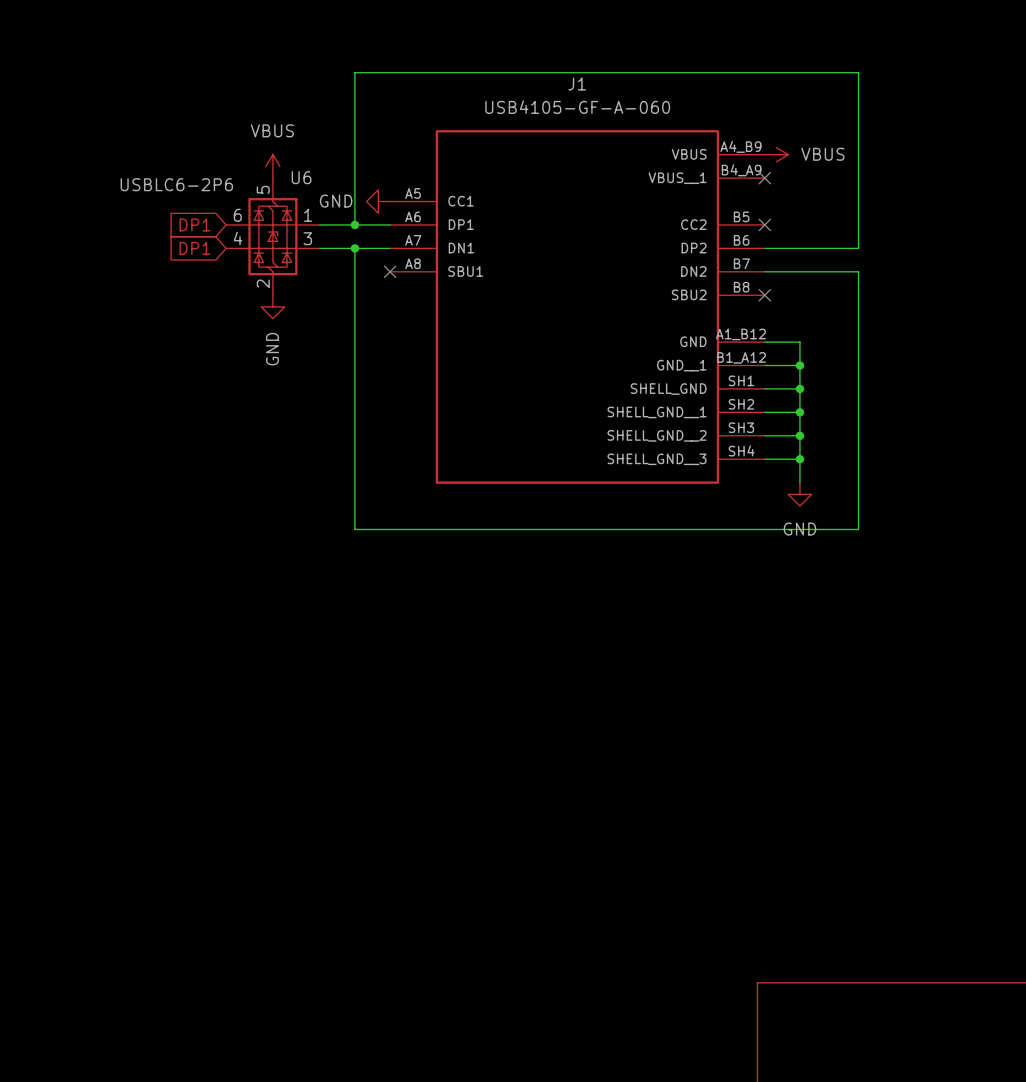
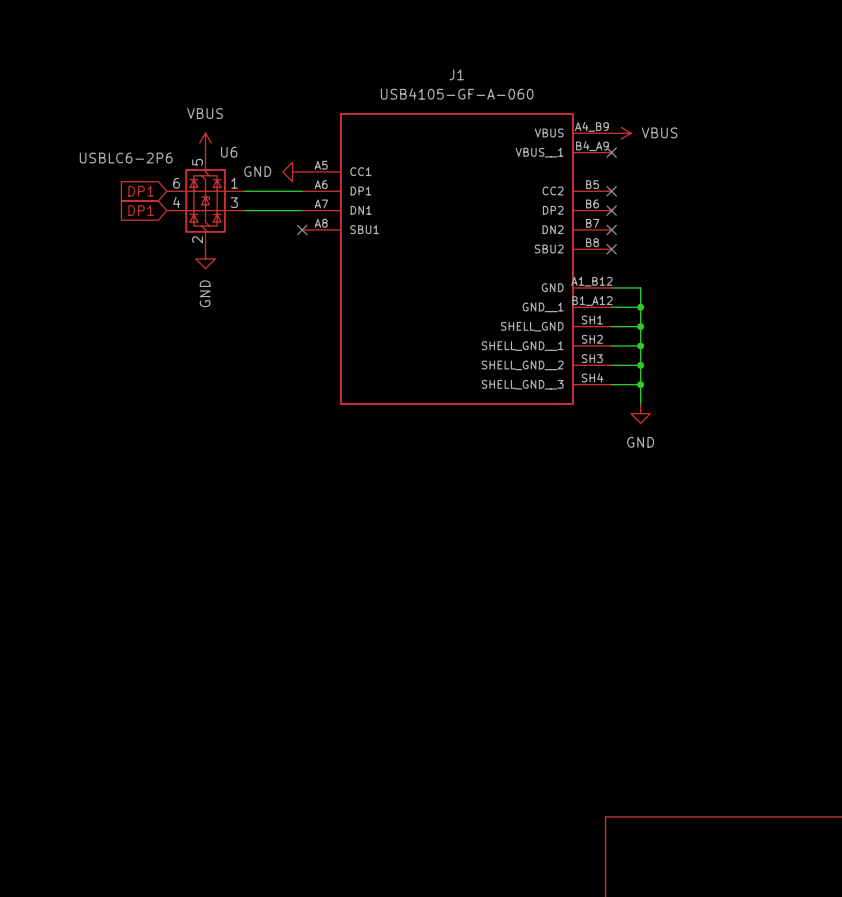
wire: (354, 224) (354, 72) (858, 72) (858, 248) (764, 248) -> none
junction: (354, 224) -> none
wire: (354, 248) (354, 529) (858, 529) (858, 271) (764, 271) -> none
junction: (354, 248) -> none
no-connect mark: none -> (611, 210)
no-connect mark: none -> (611, 229)

